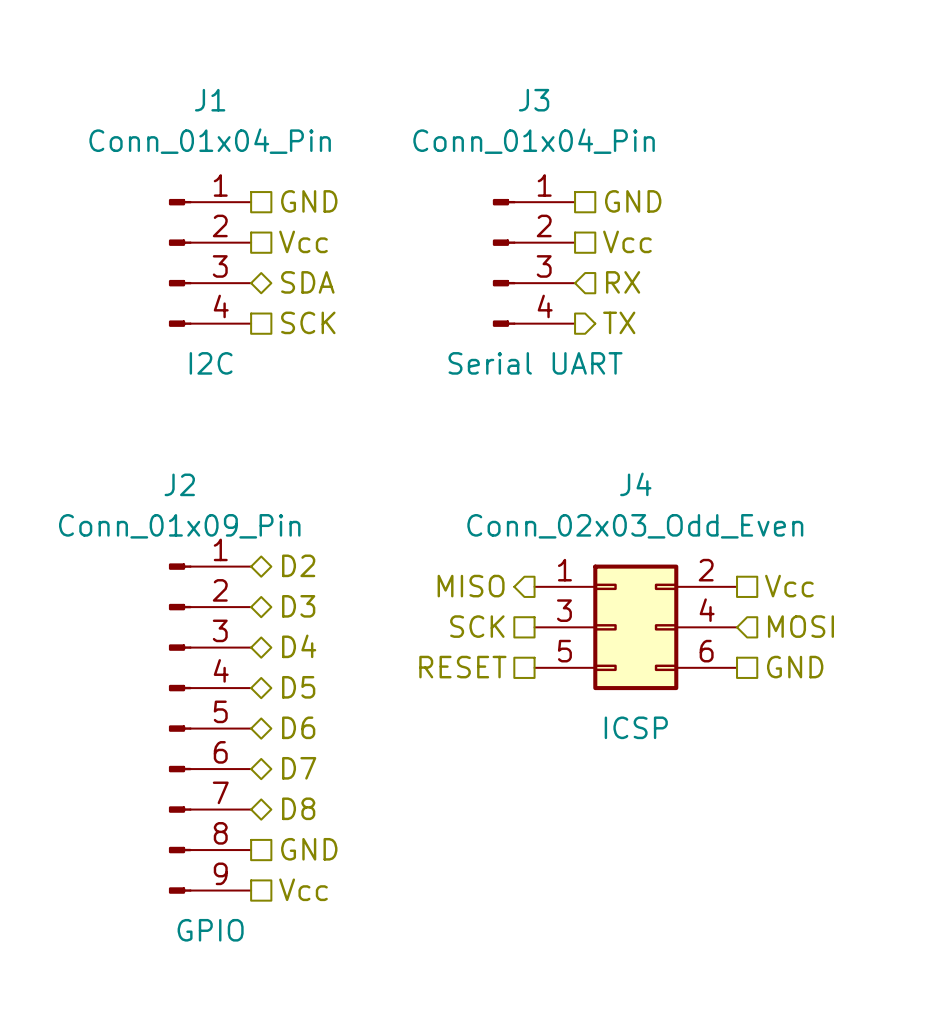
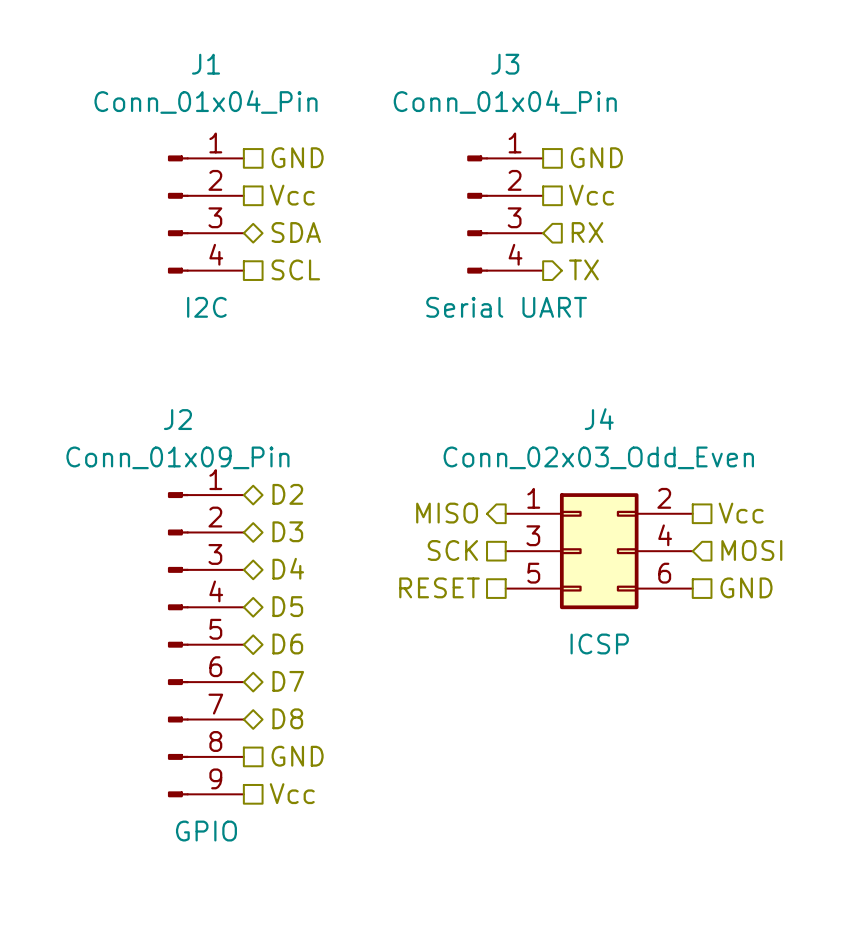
hierarchical label: SCK (308, 322) -> SCL (295, 269)

